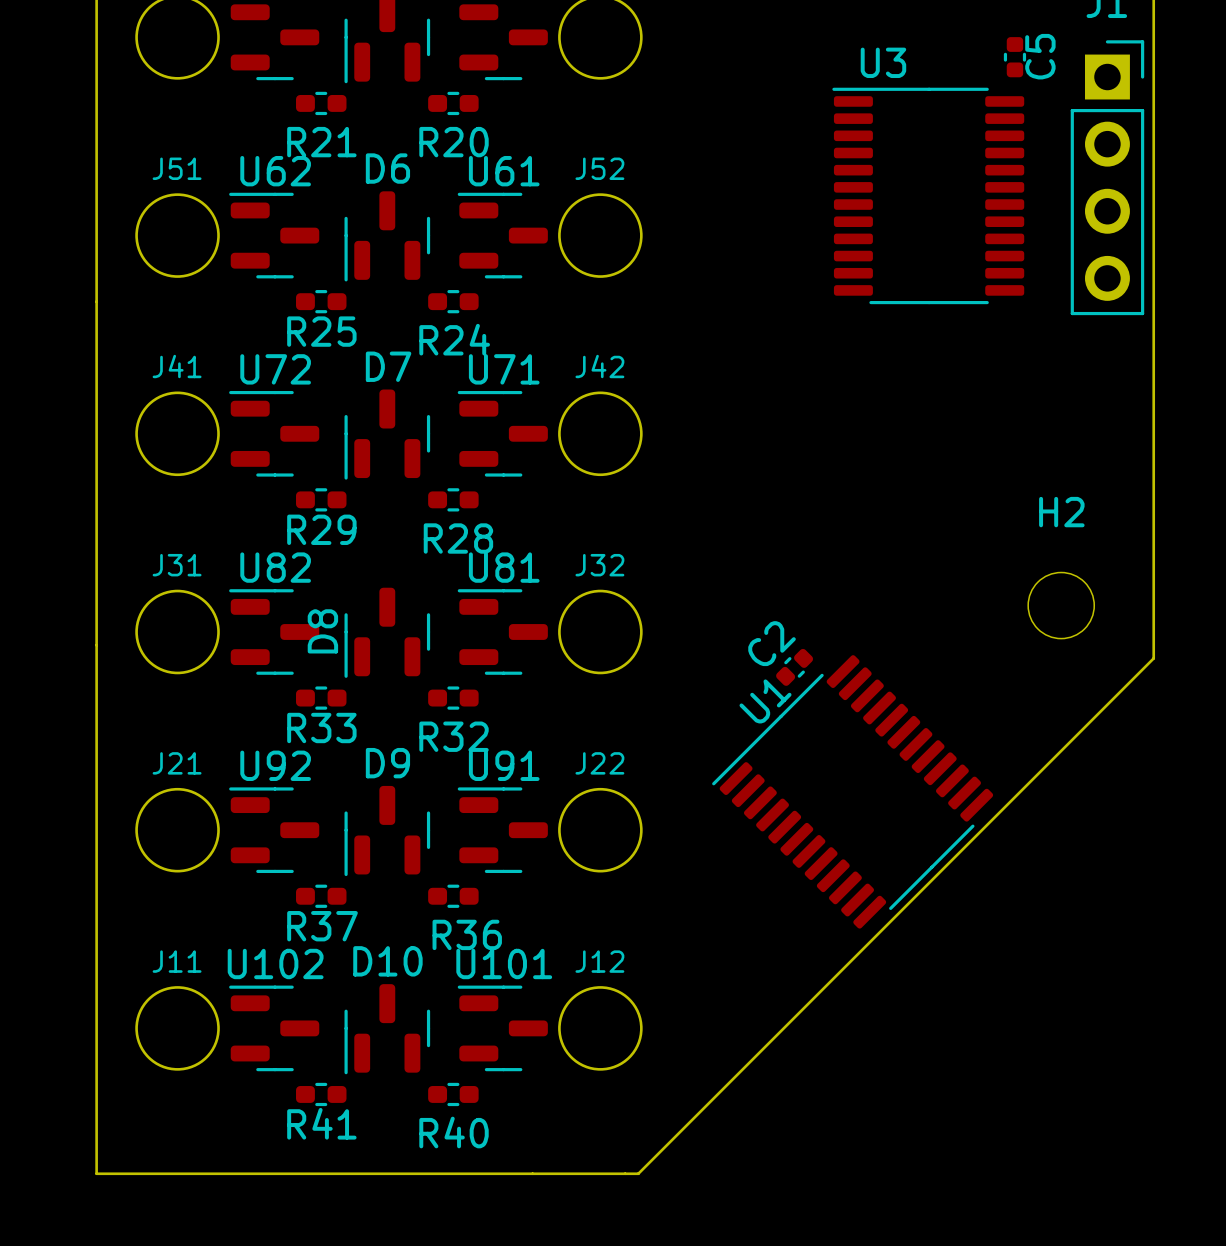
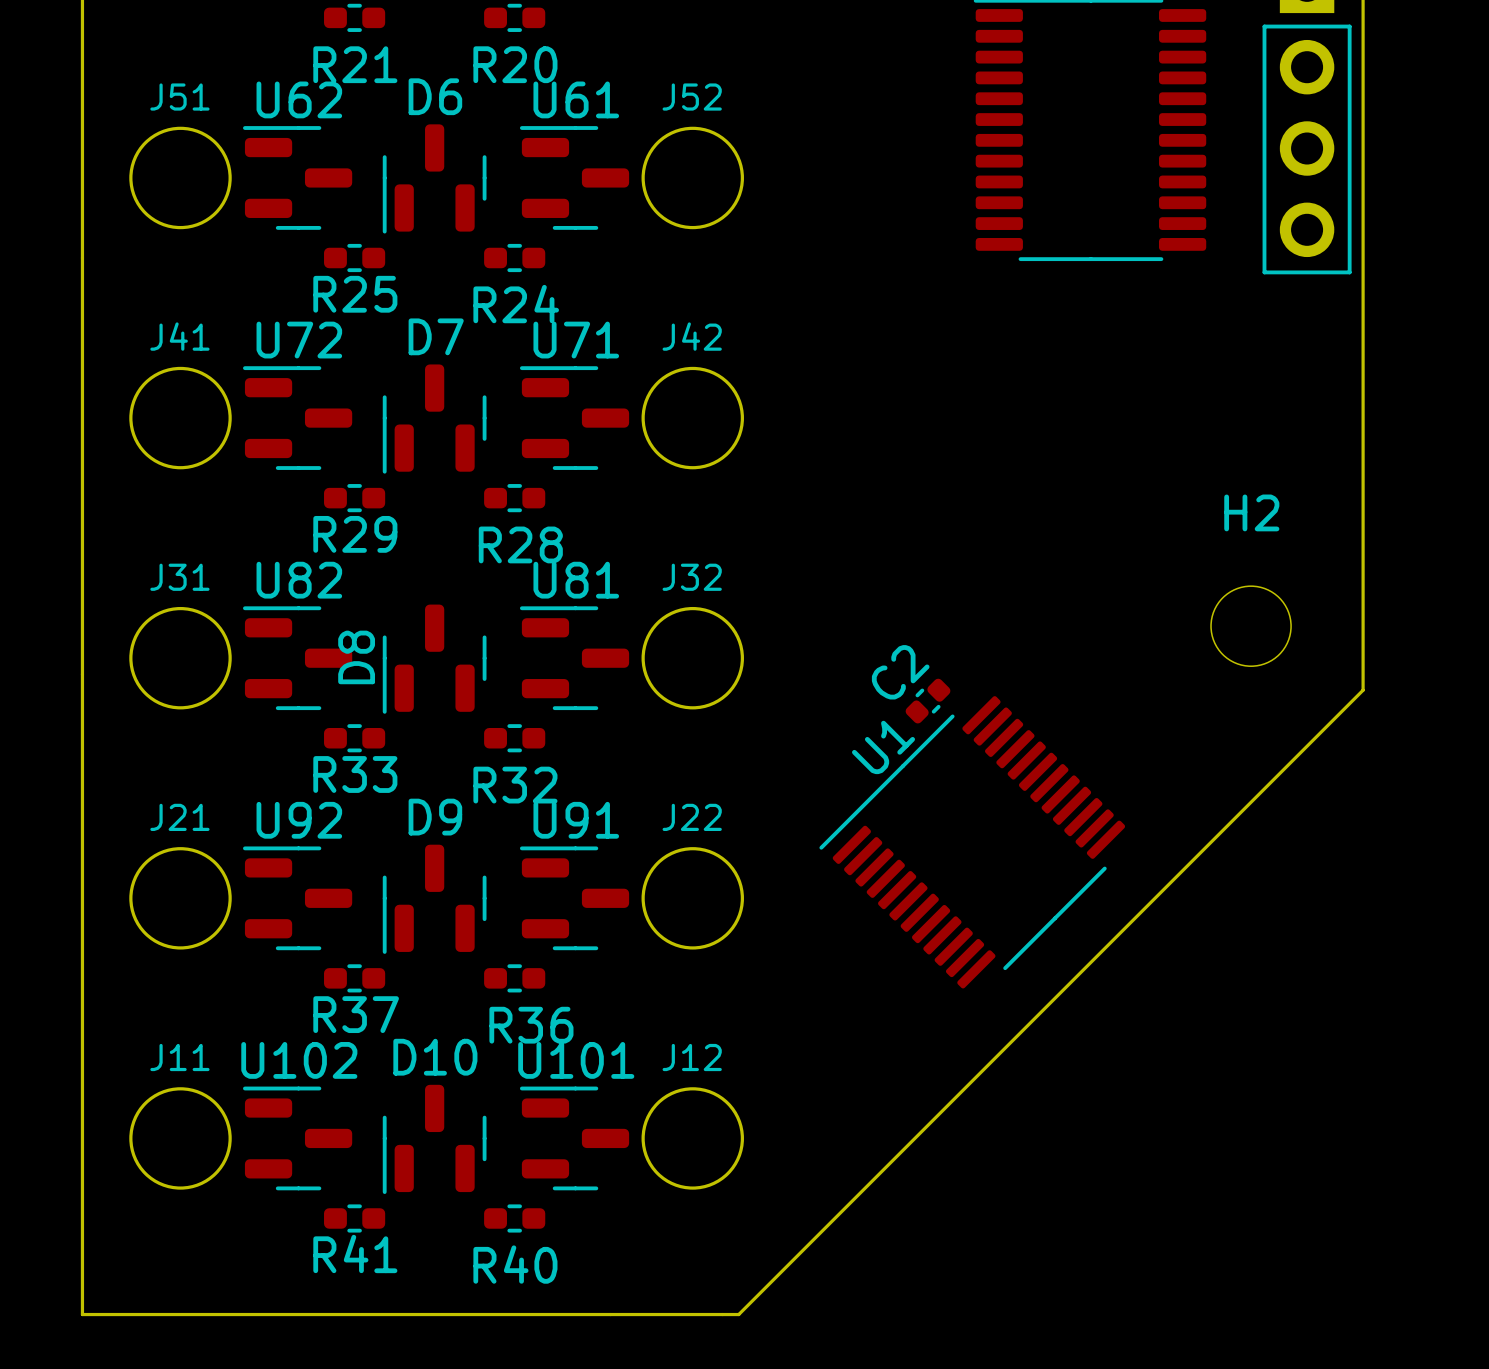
U1 footprint: [712, 655, 994, 929] -> [819, 696, 1126, 989]

